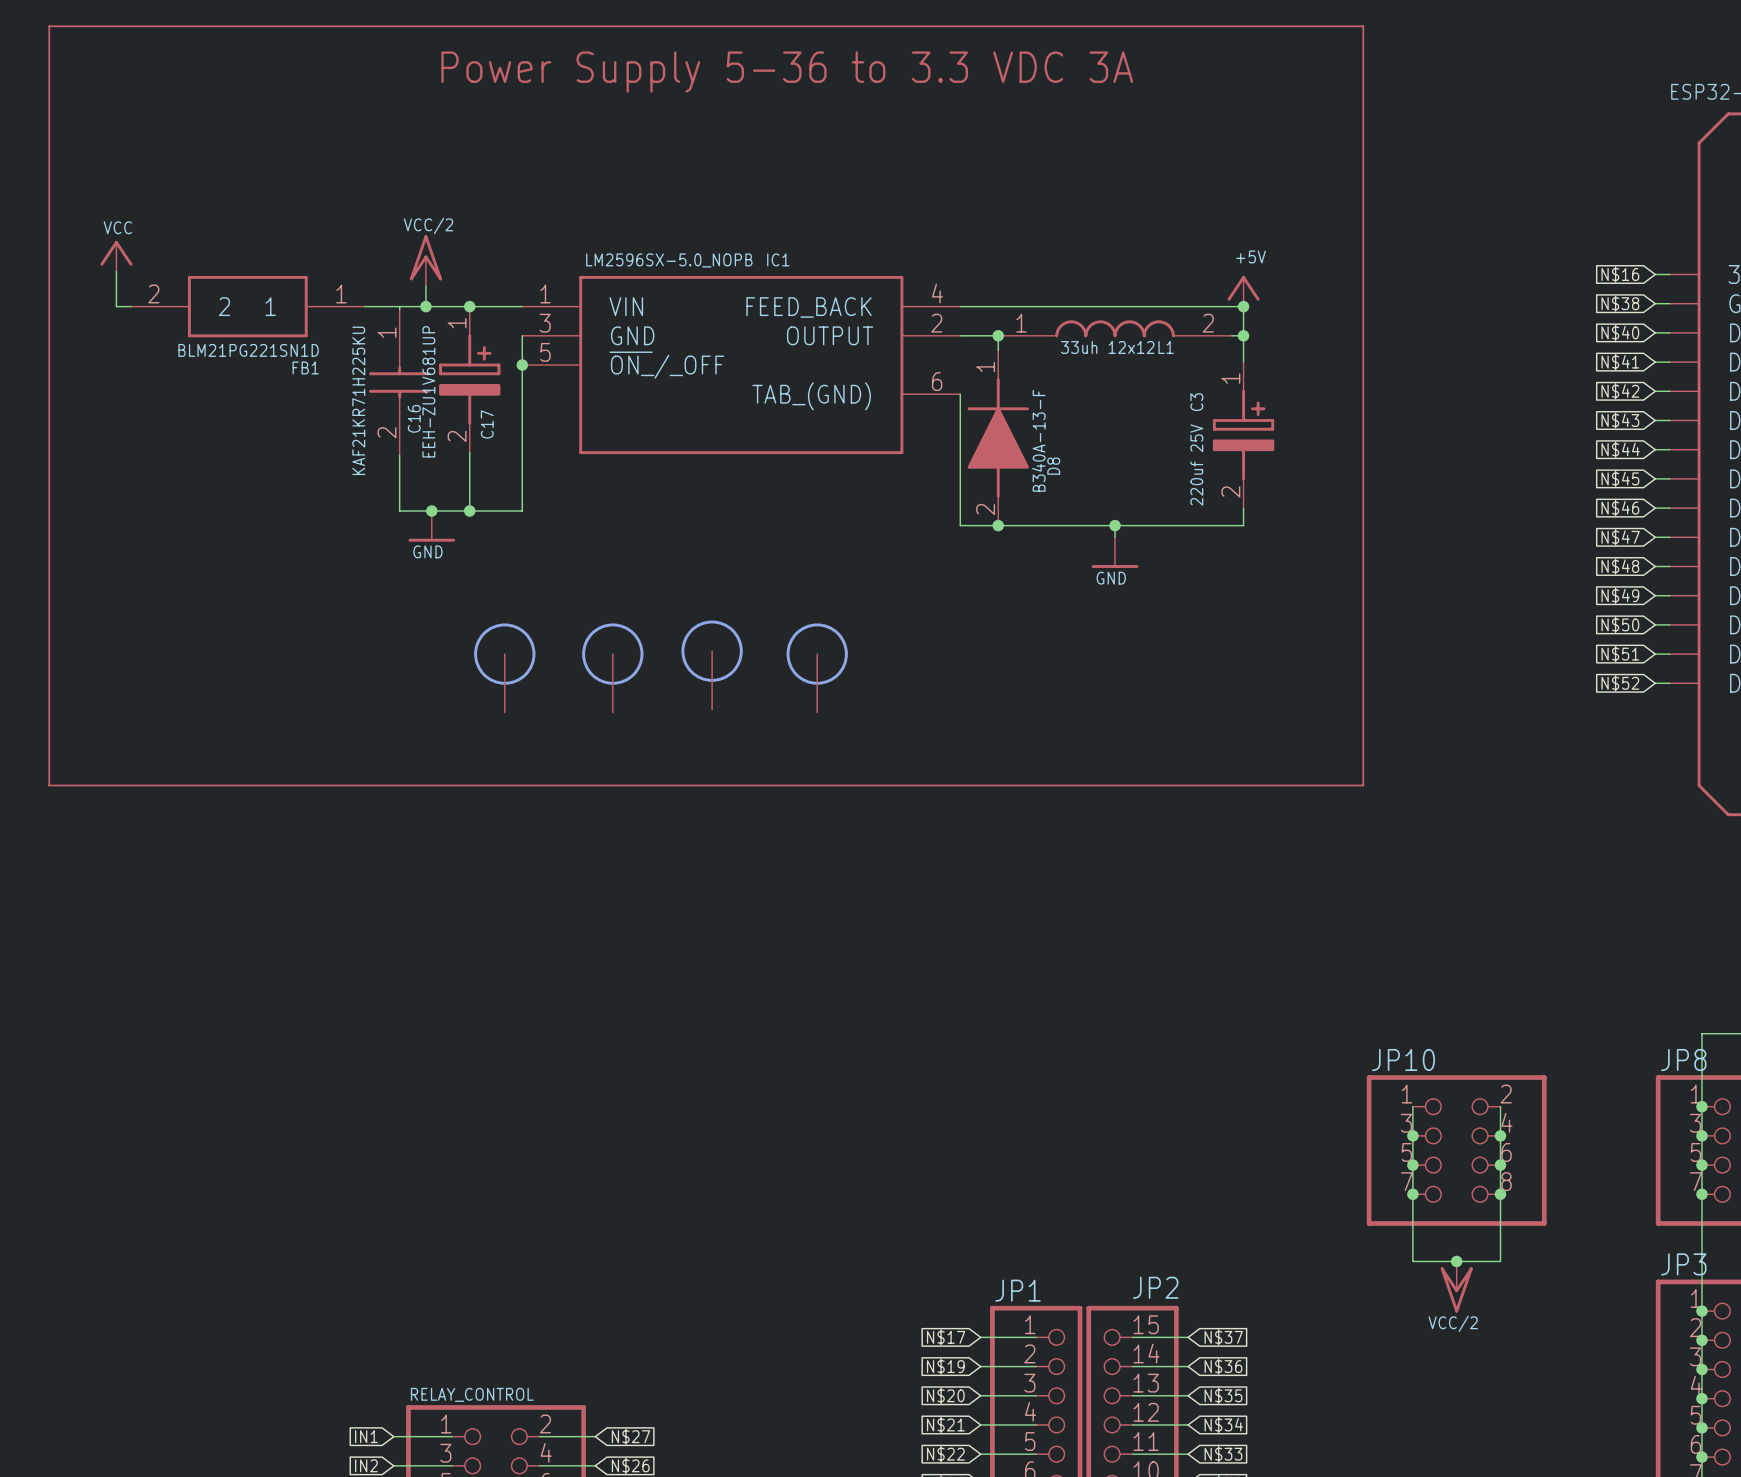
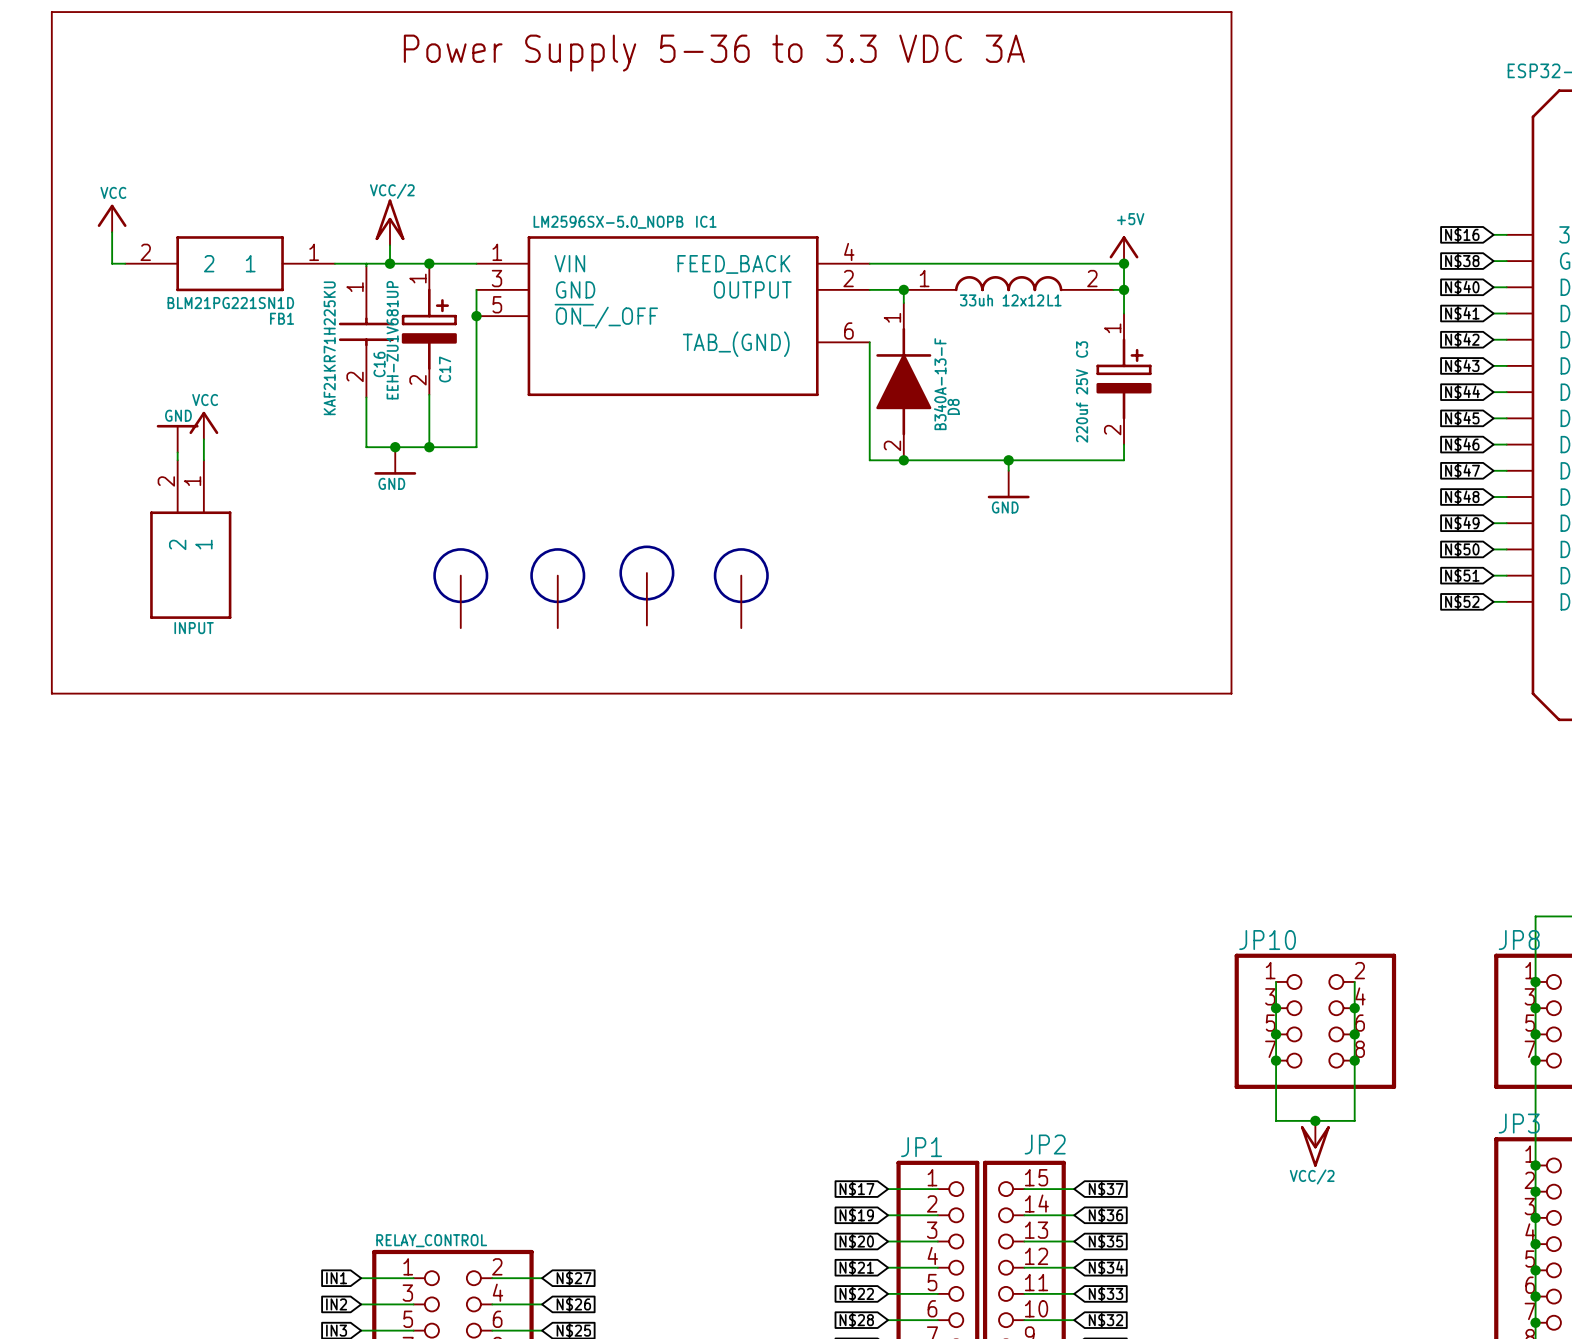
power symbol: none -> VCC (203, 425)
power symbol: none -> GND (177, 438)
wire: none -> (203, 439) (203, 460)
wire: none -> (177, 452) (177, 460)
INPUT: none -> (190, 539)

